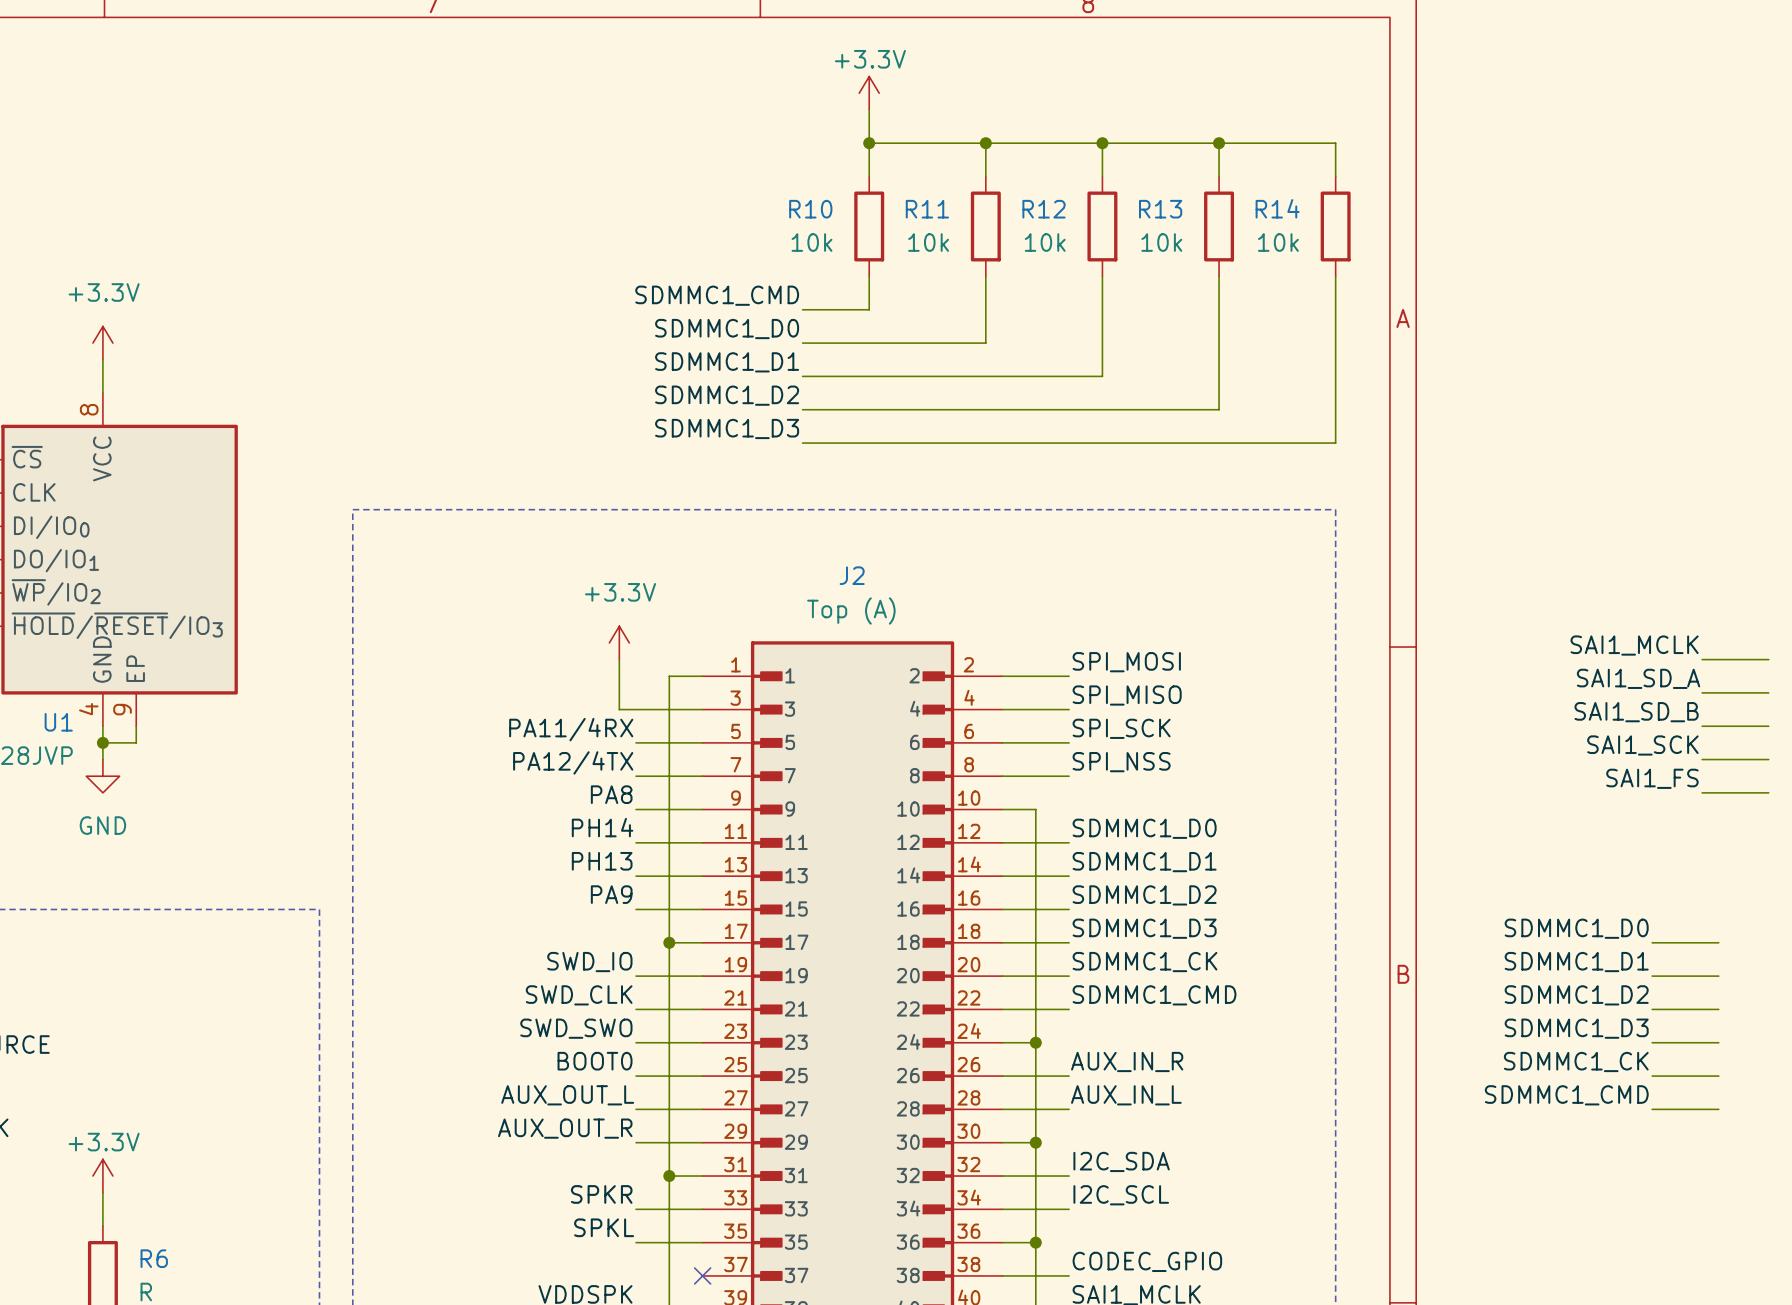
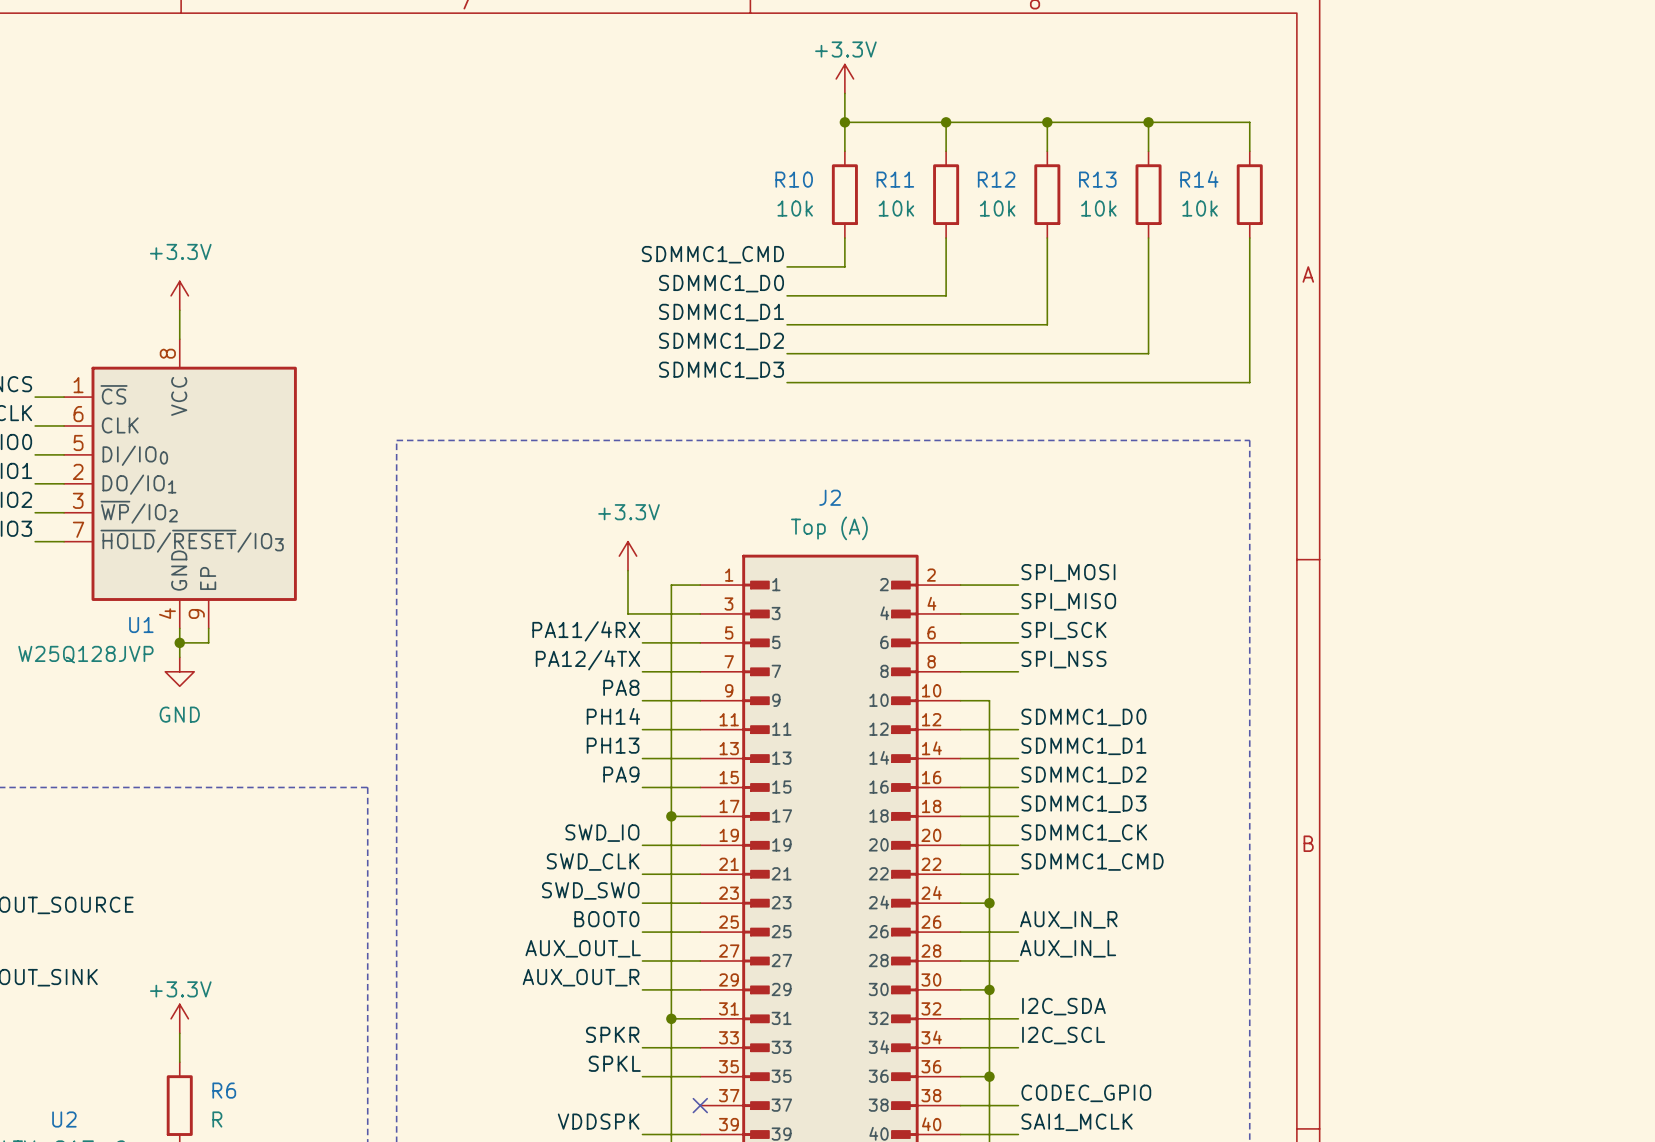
label: SAI1_MCLK (1634, 645) -> none
wire: (1702, 659) (1768, 659) -> none
label: SAI1_SD_A (1638, 678) -> none
wire: (1702, 692) (1768, 692) -> none
label: SAI1_SD_B (1636, 712) -> none
wire: (1702, 726) (1768, 726) -> none
label: SAI1_SCK (1642, 745) -> none
wire: (1702, 759) (1768, 759) -> none
label: SAI1_FS (1652, 778) -> none
wire: (1702, 792) (1768, 792) -> none
label: SDMMC1_D0 (1576, 928) -> none
wire: (1652, 942) (1718, 942) -> none
label: SDMMC1_D1 (1576, 962) -> none
wire: (1652, 976) (1718, 976) -> none
label: SDMMC1_D2 (1576, 995) -> none
wire: (1652, 1009) (1718, 1009) -> none
label: SDMMC1_D3 (1576, 1028) -> none
wire: (1652, 1042) (1718, 1042) -> none
label: SDMMC1_CK (1576, 1061) -> none
wire: (1652, 1076) (1718, 1076) -> none
label: SDMMC1_CMD (1566, 1095) -> none
wire: (1652, 1109) (1718, 1109) -> none

